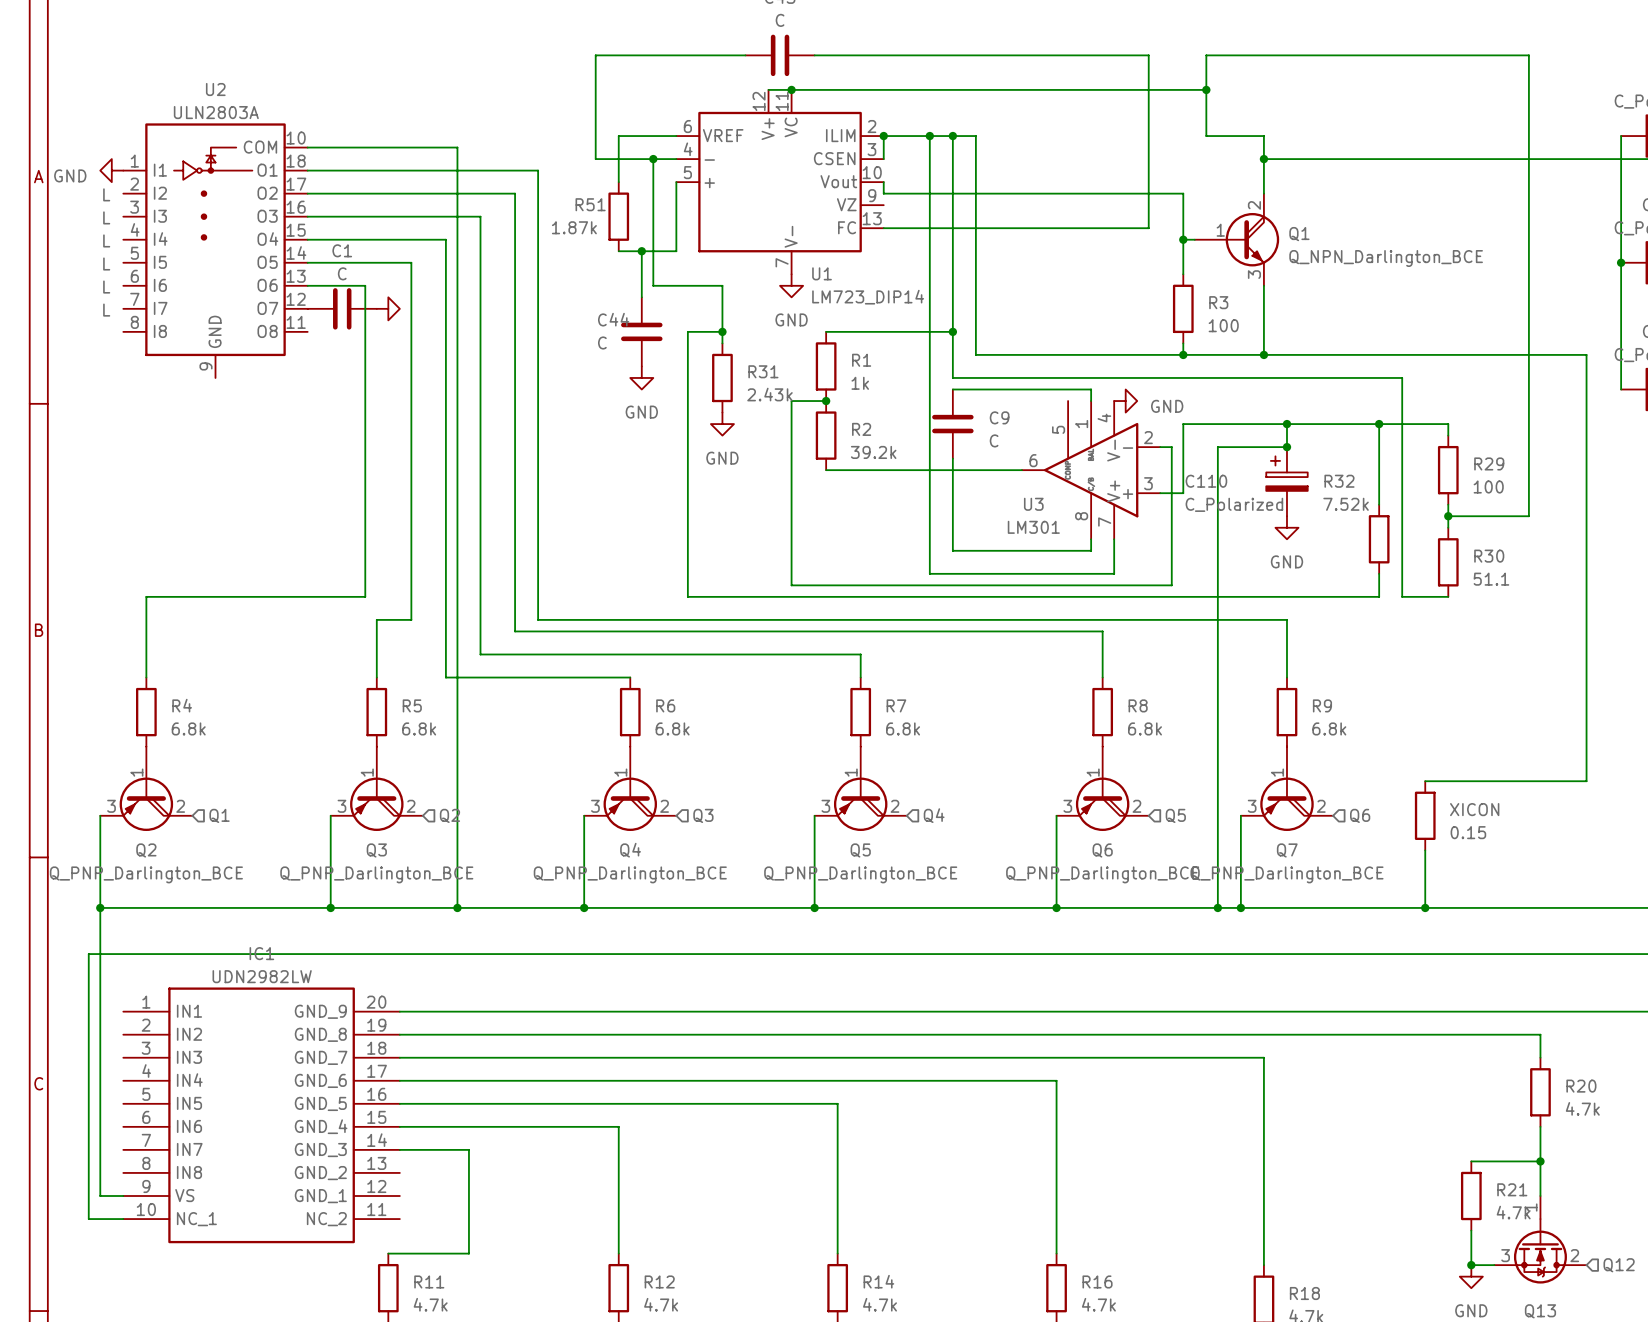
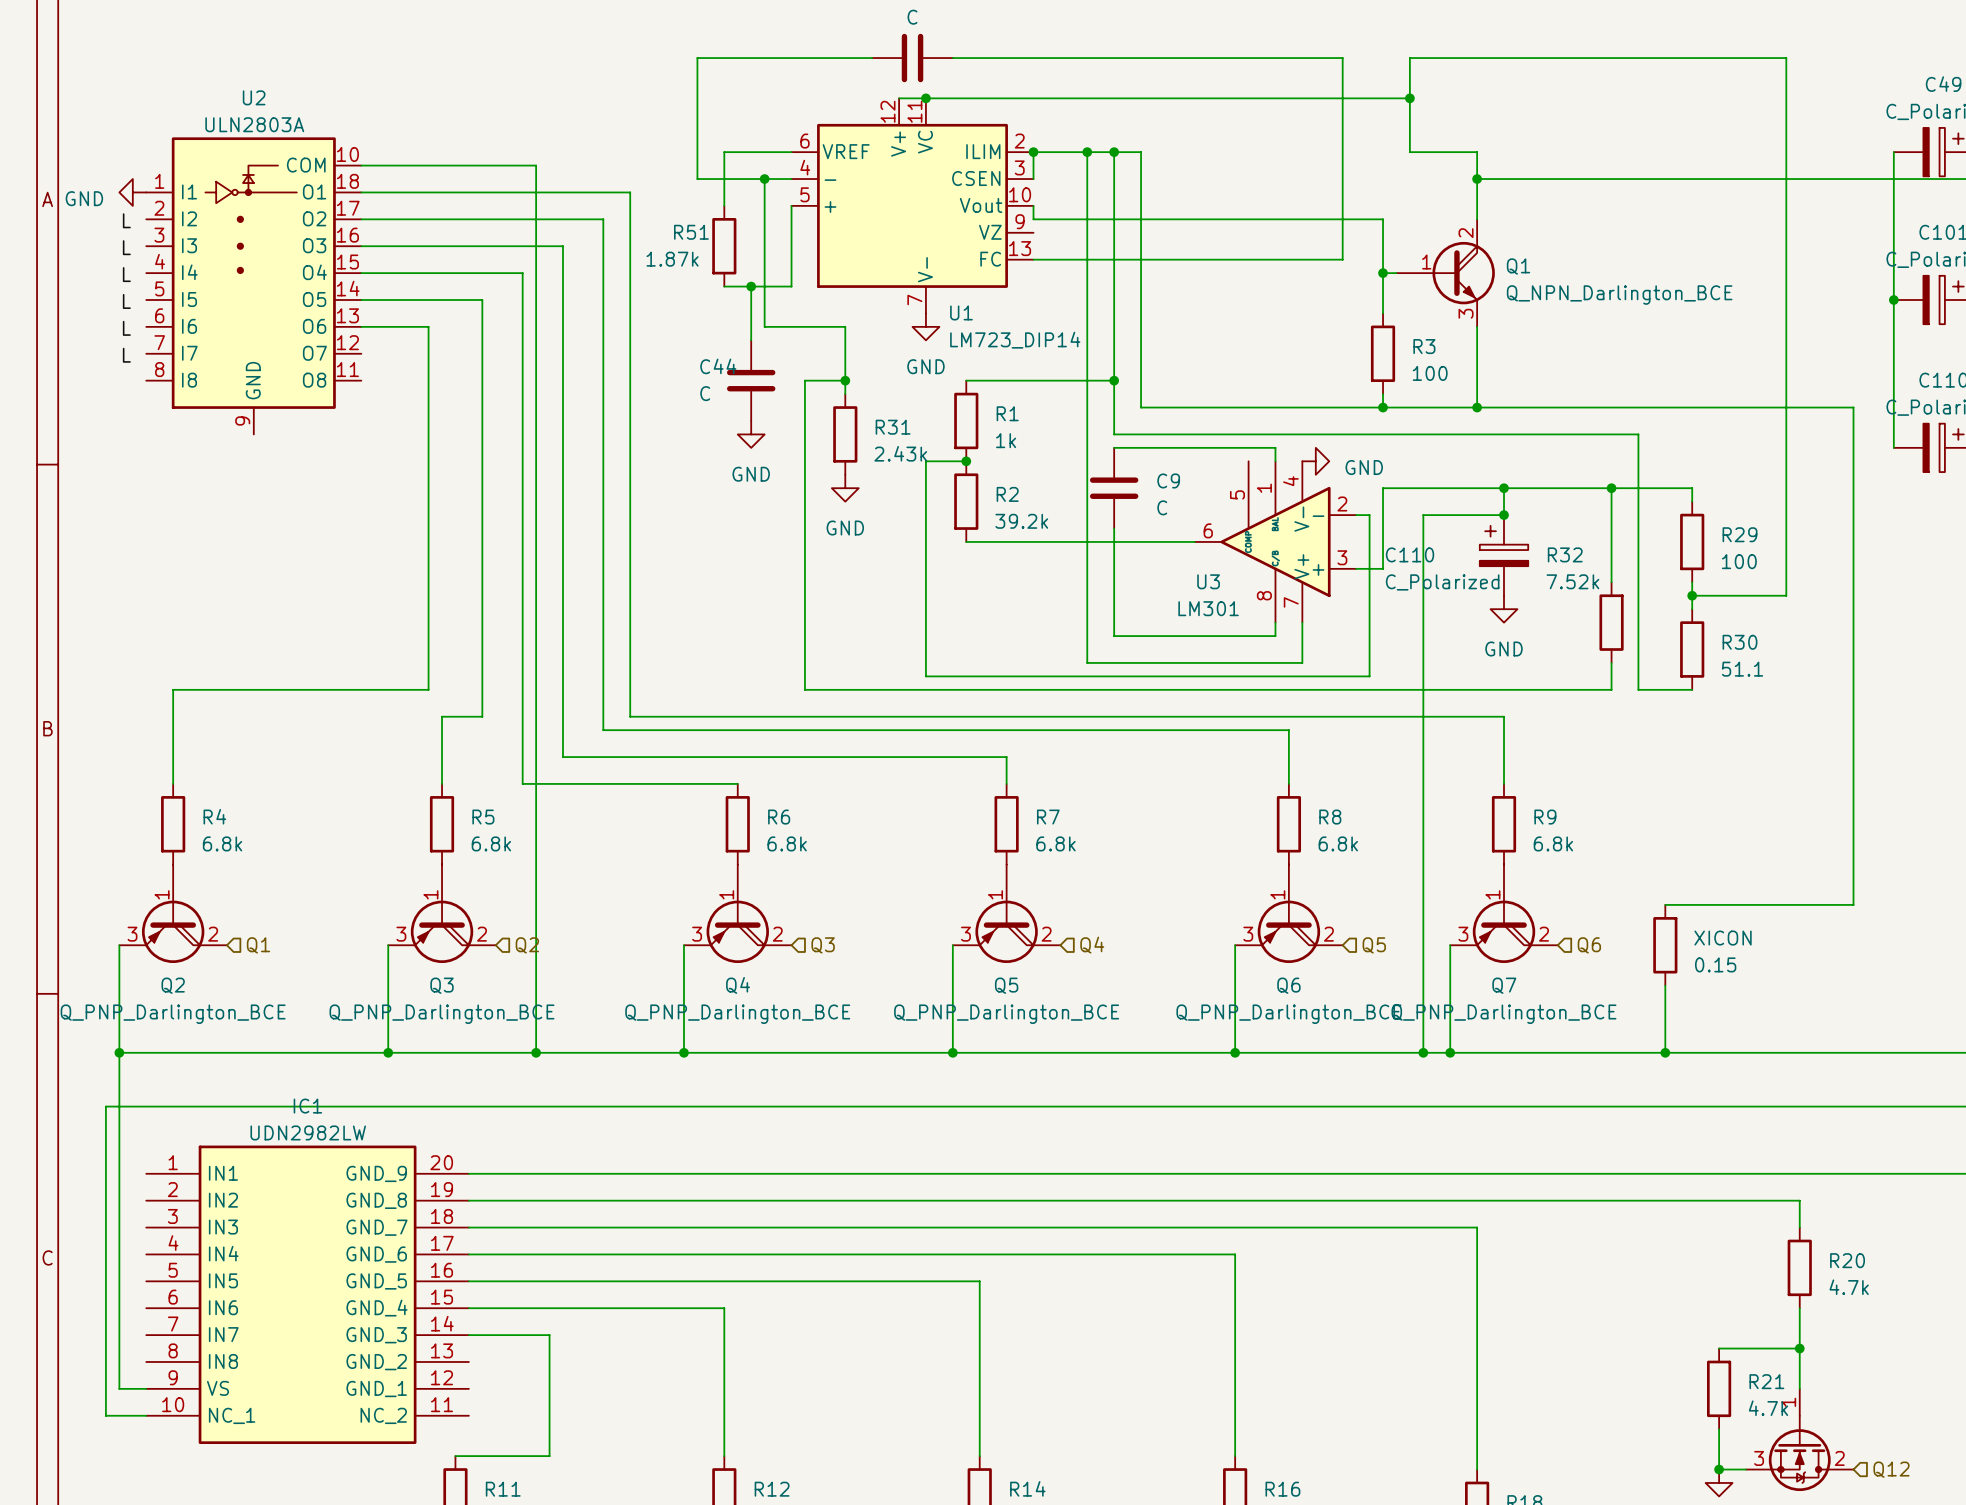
C1: C (342, 308) -> none
power symbol: (388, 308) -> none

